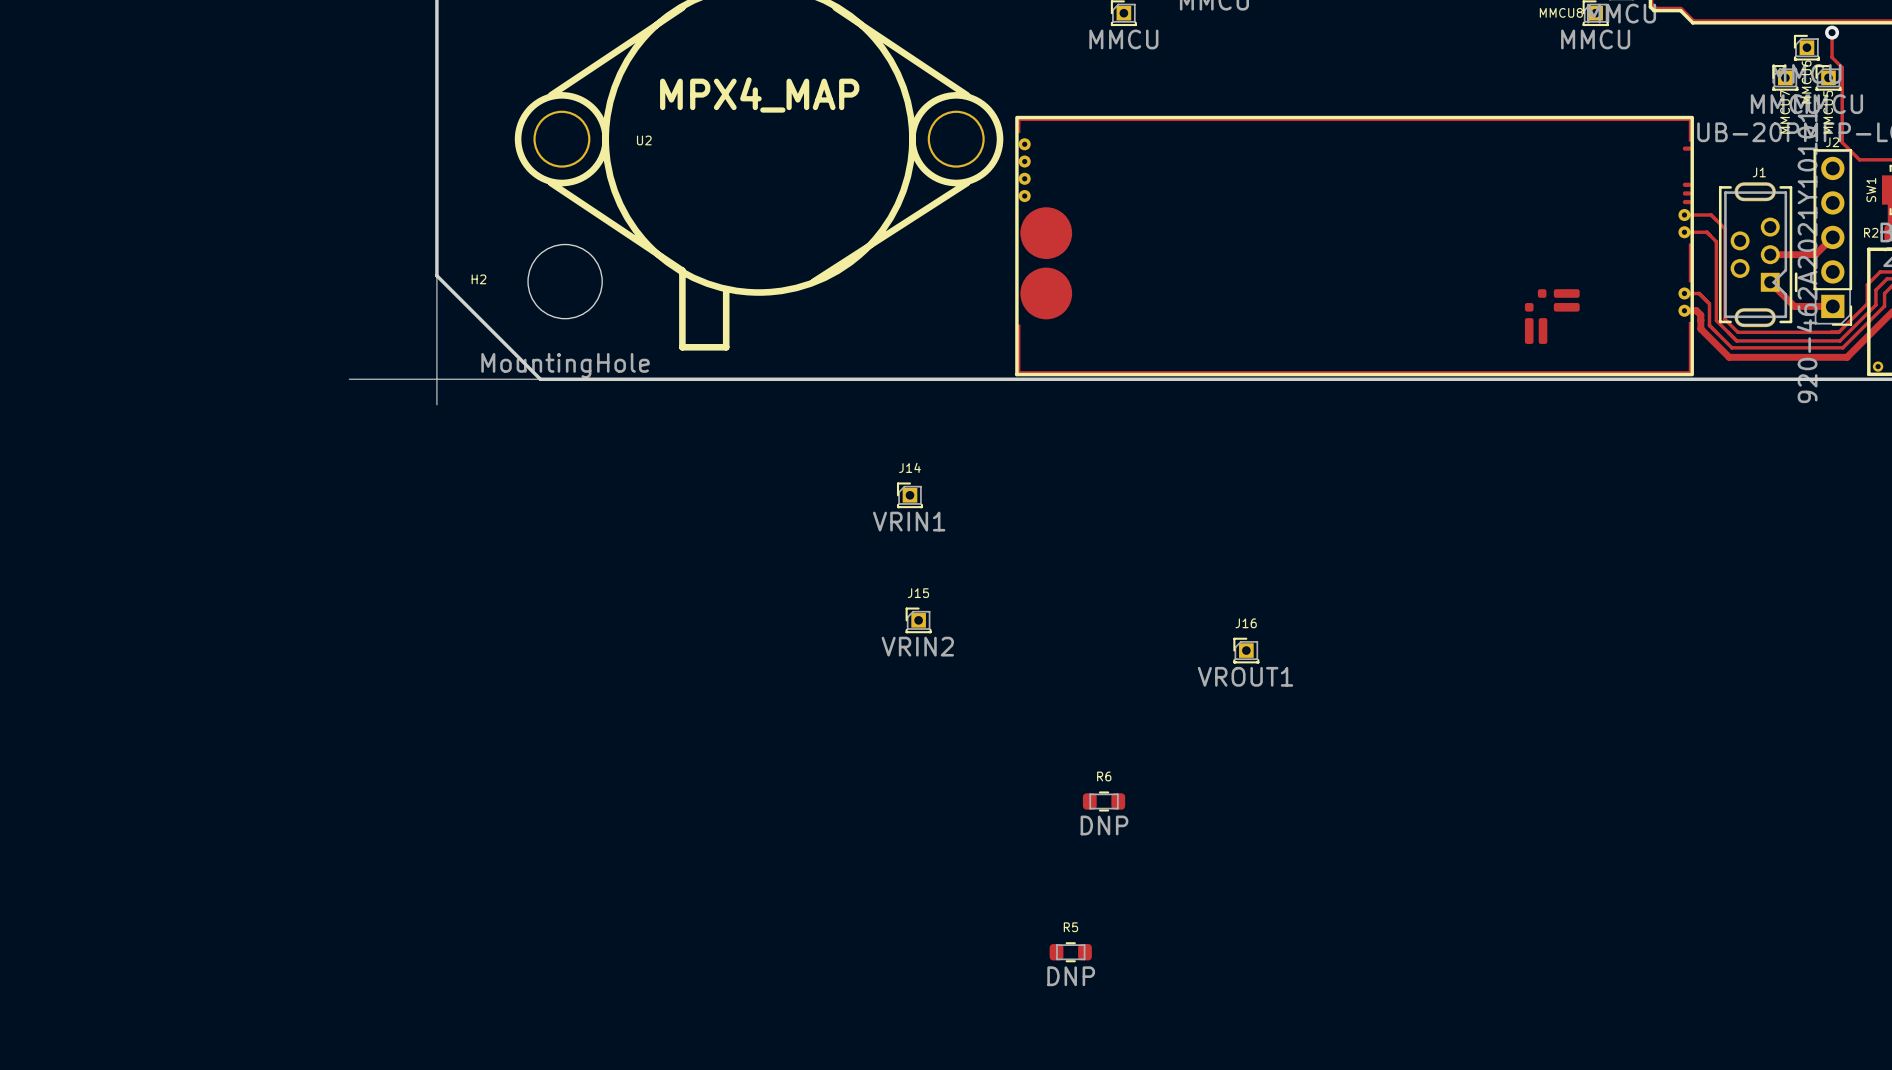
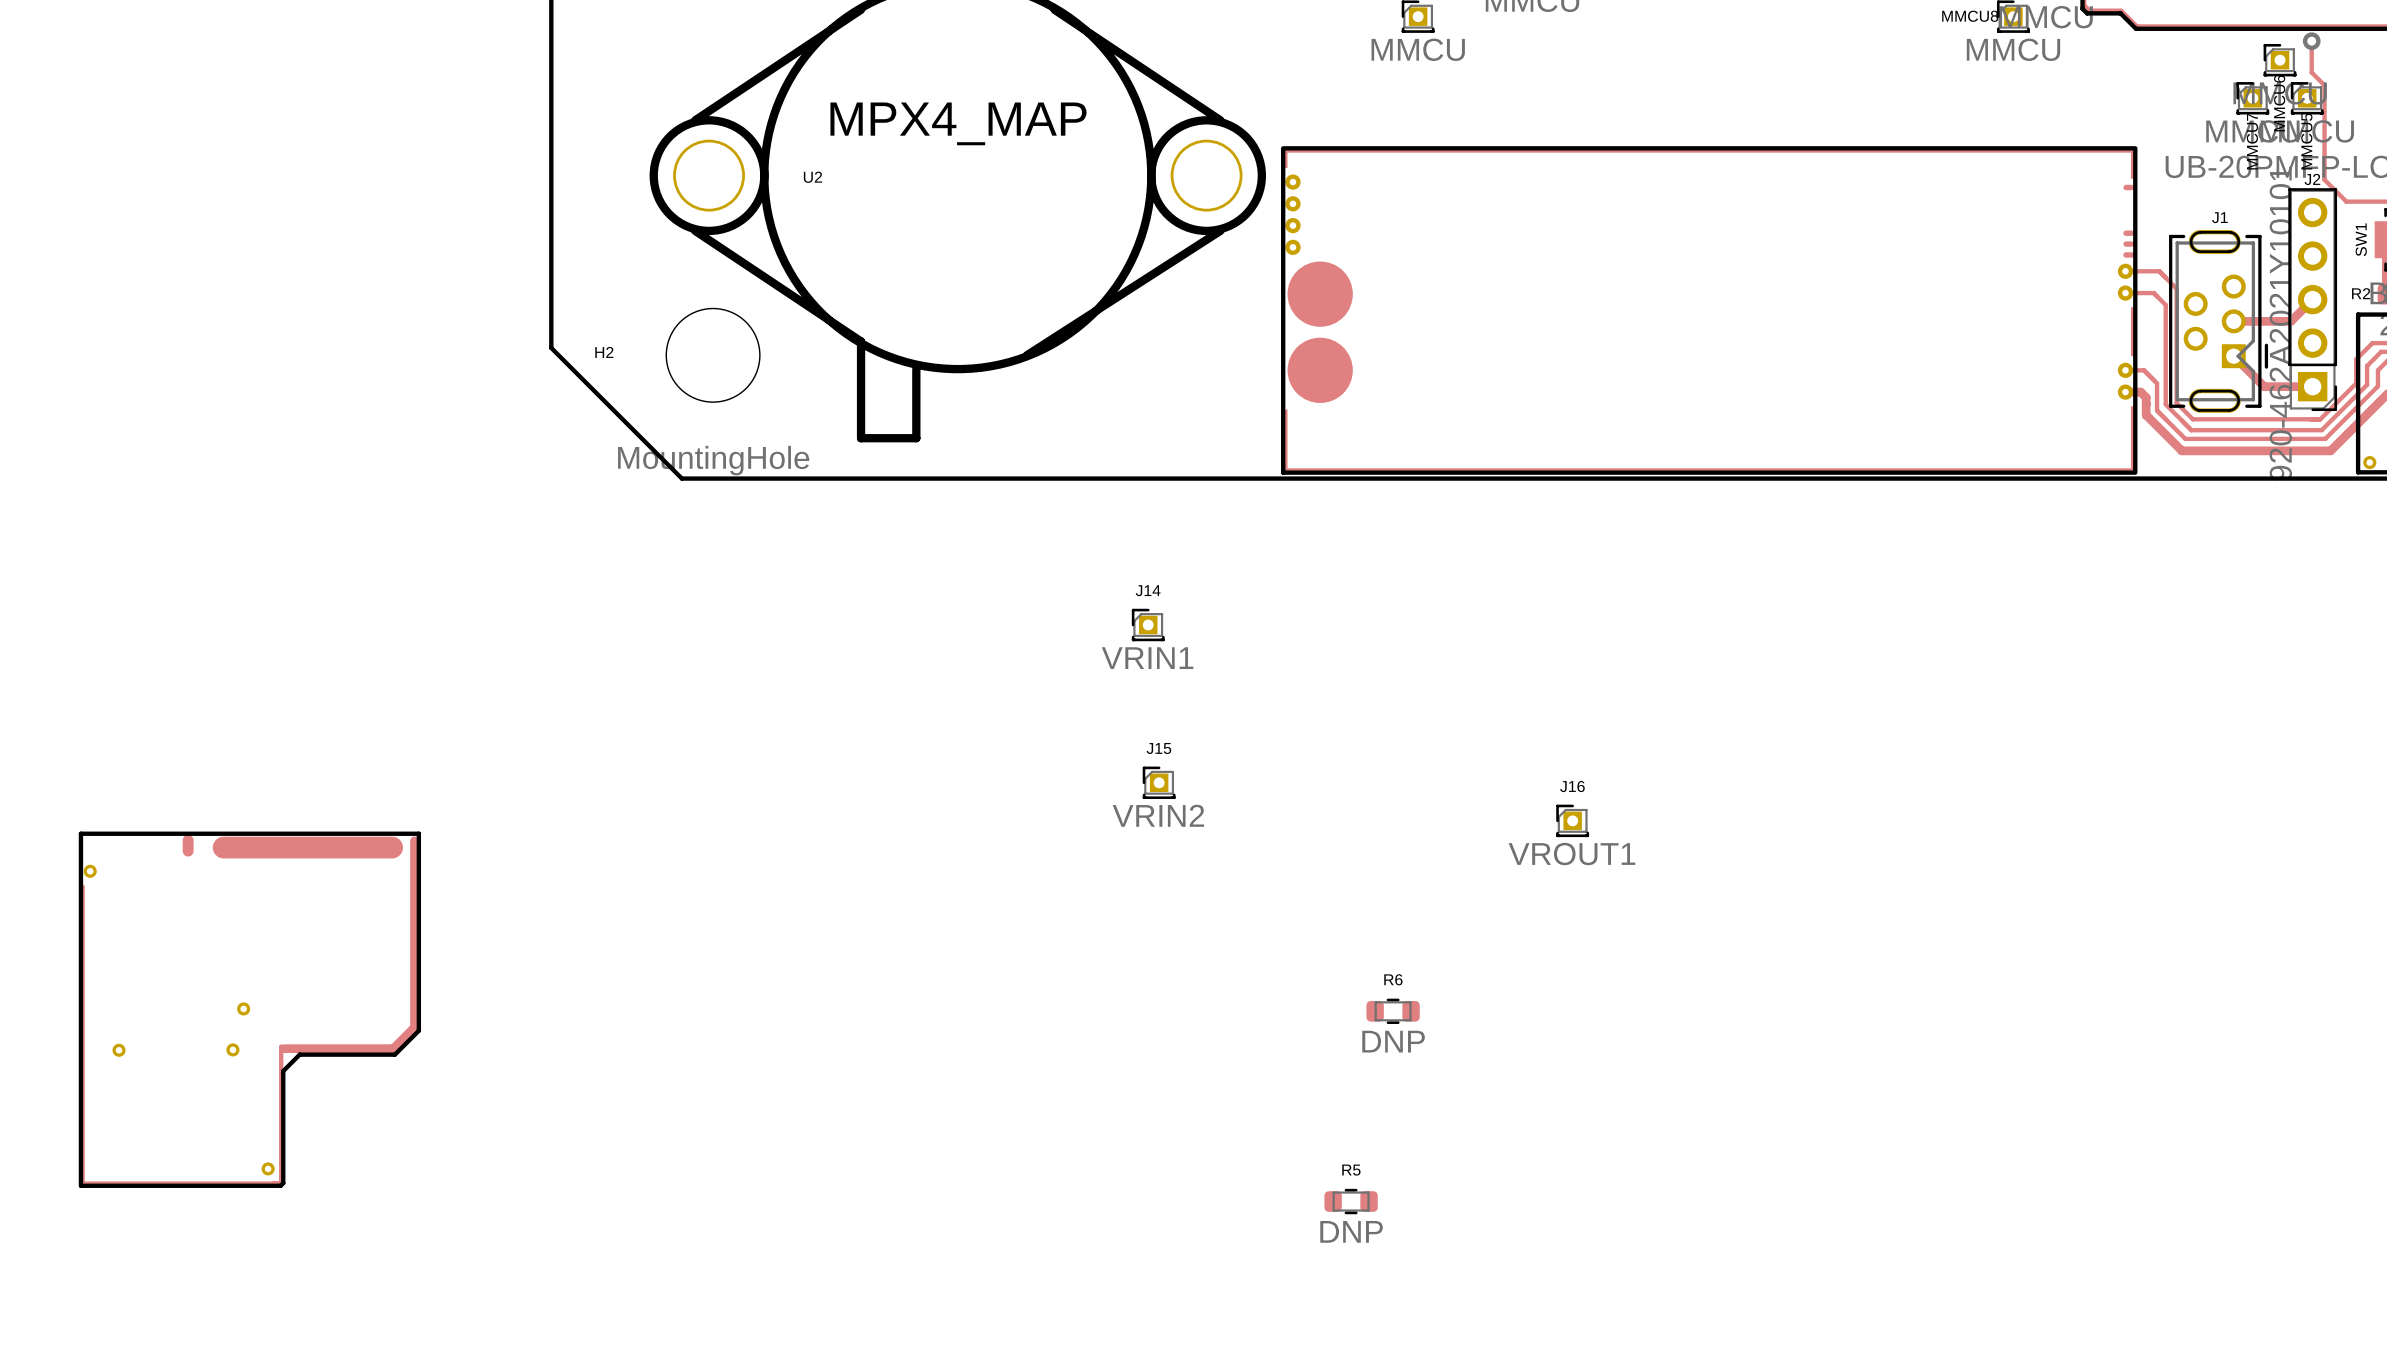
part footprint: [1015, 115, 1694, 377] -> [1281, 146, 2138, 475]
line: (436, 266) (436, 404) -> none
line: (349, 379) (573, 379) -> none
part: none -> (249, 1009)

